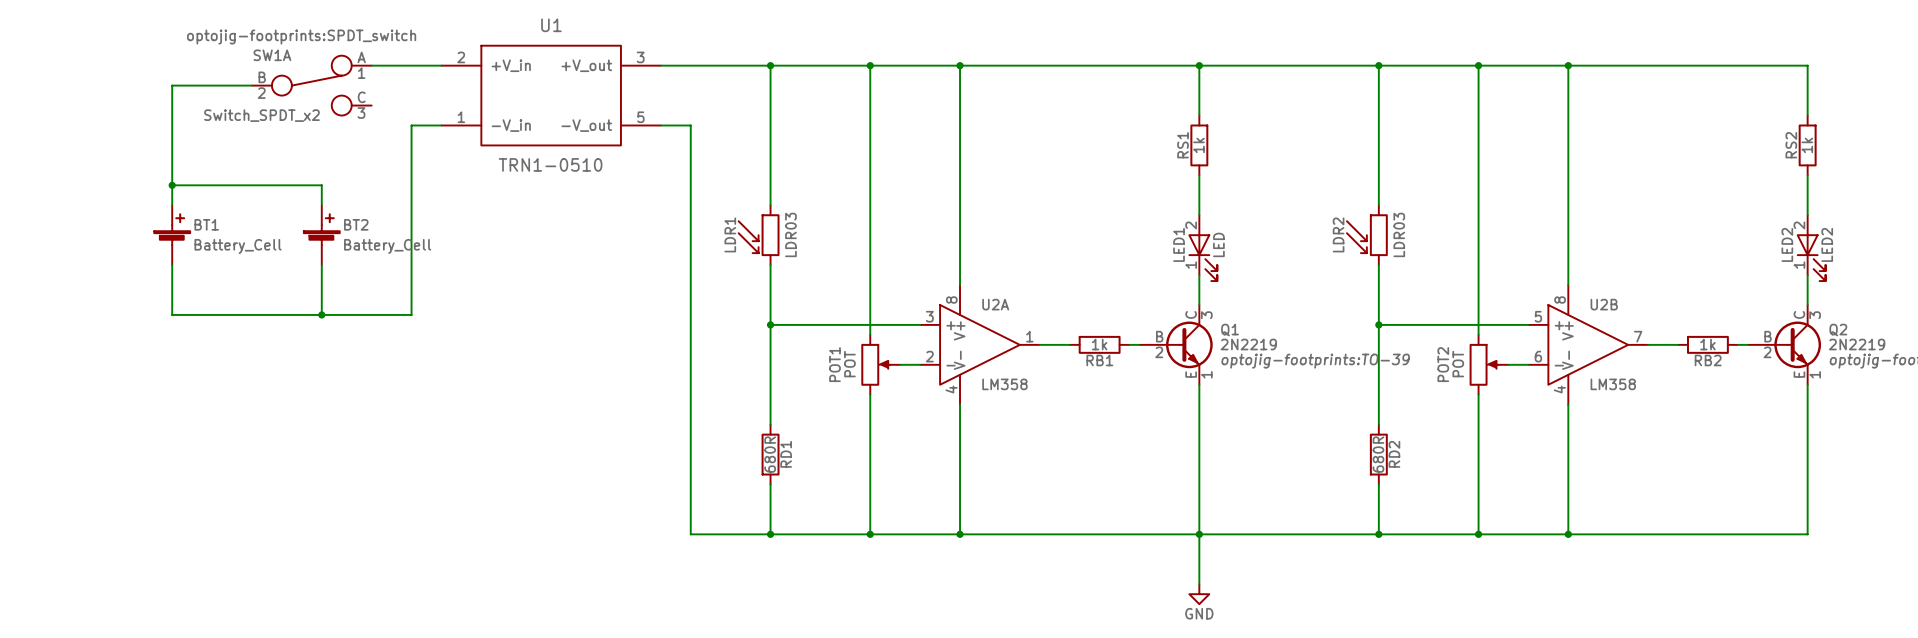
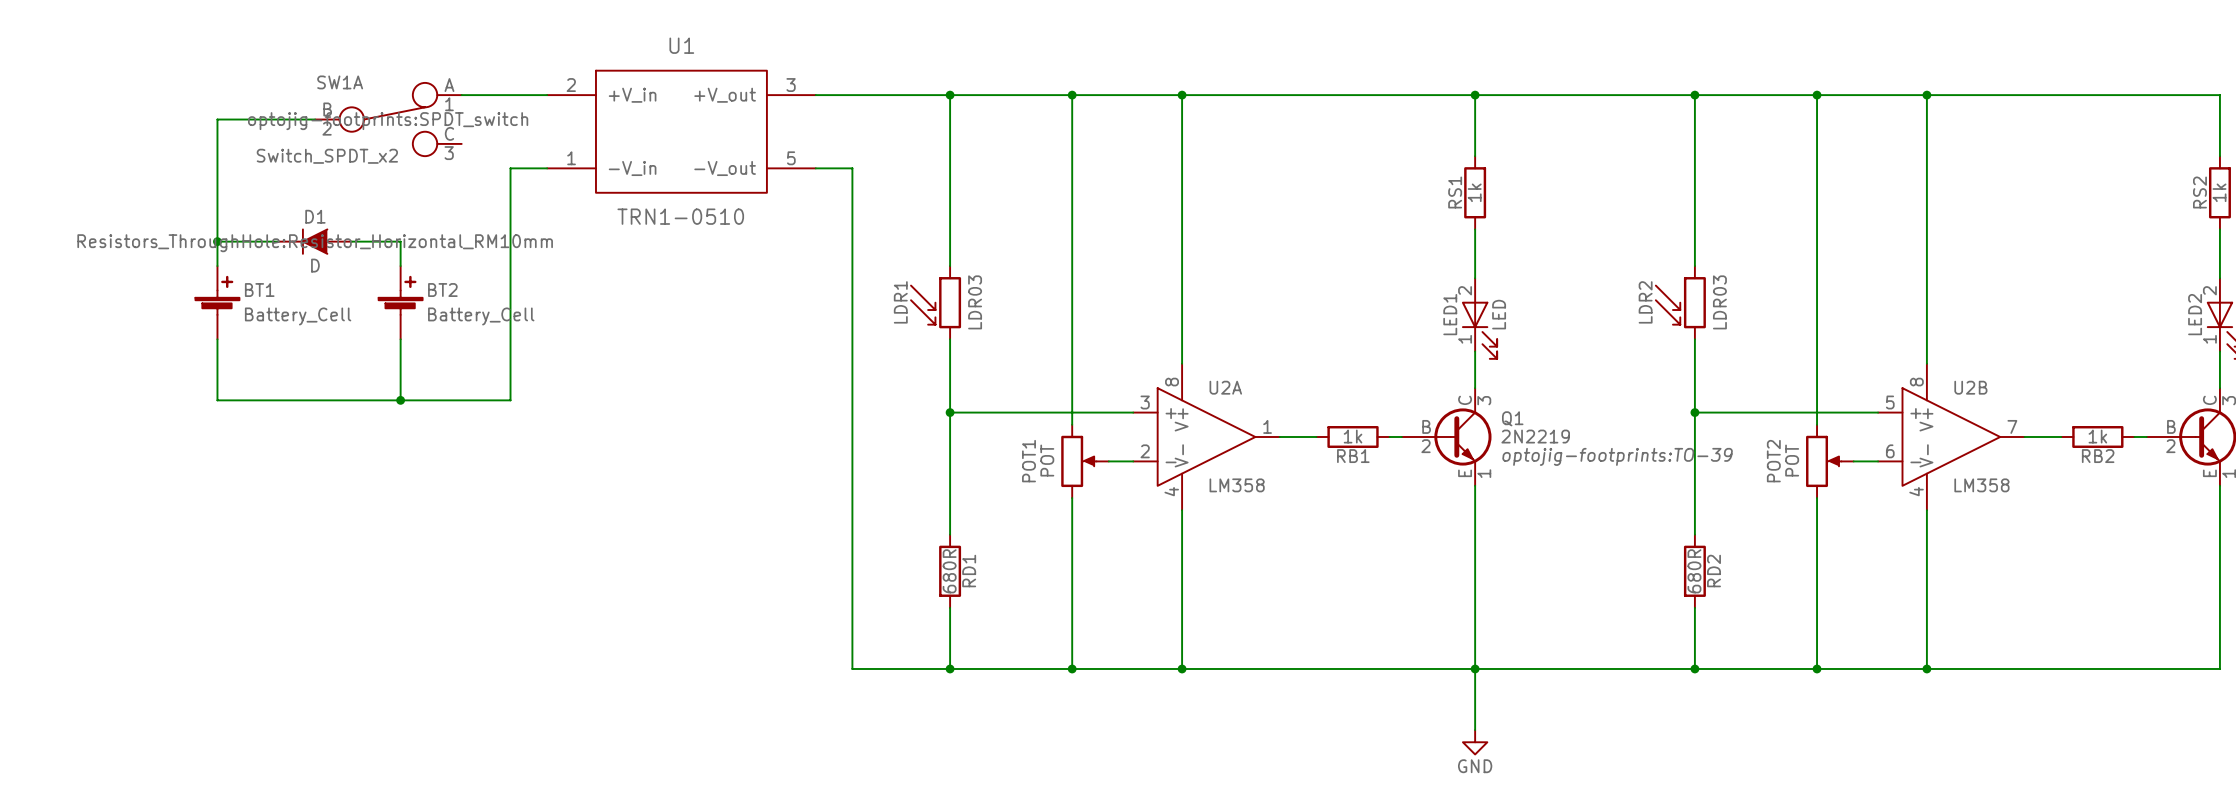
SW1A text position: optojig-footprints:SPDT_switch (301, 37) -> optojig-footprints:SPDT_switch (388, 121)
D1: none -> D (315, 241)

